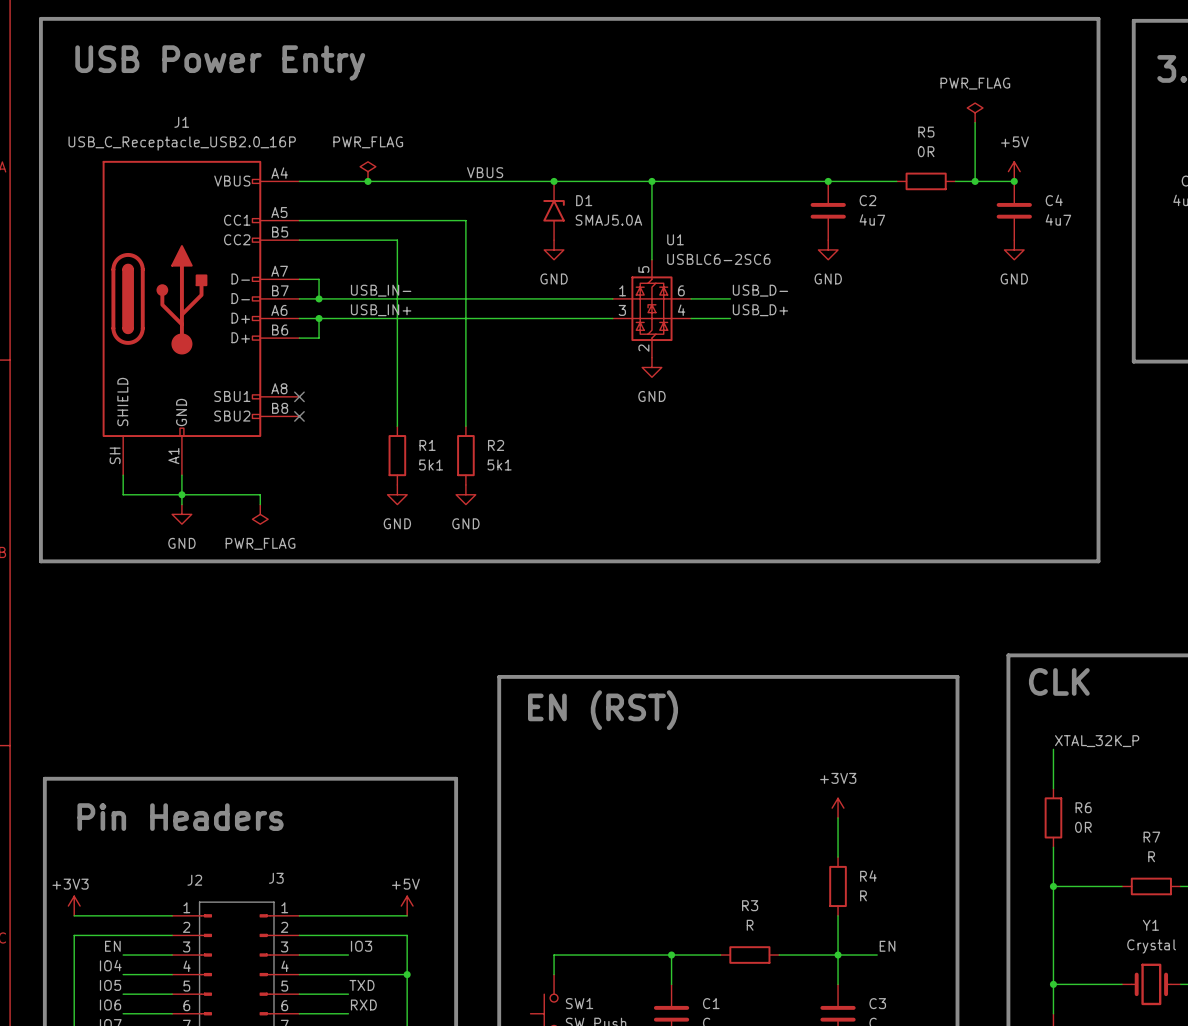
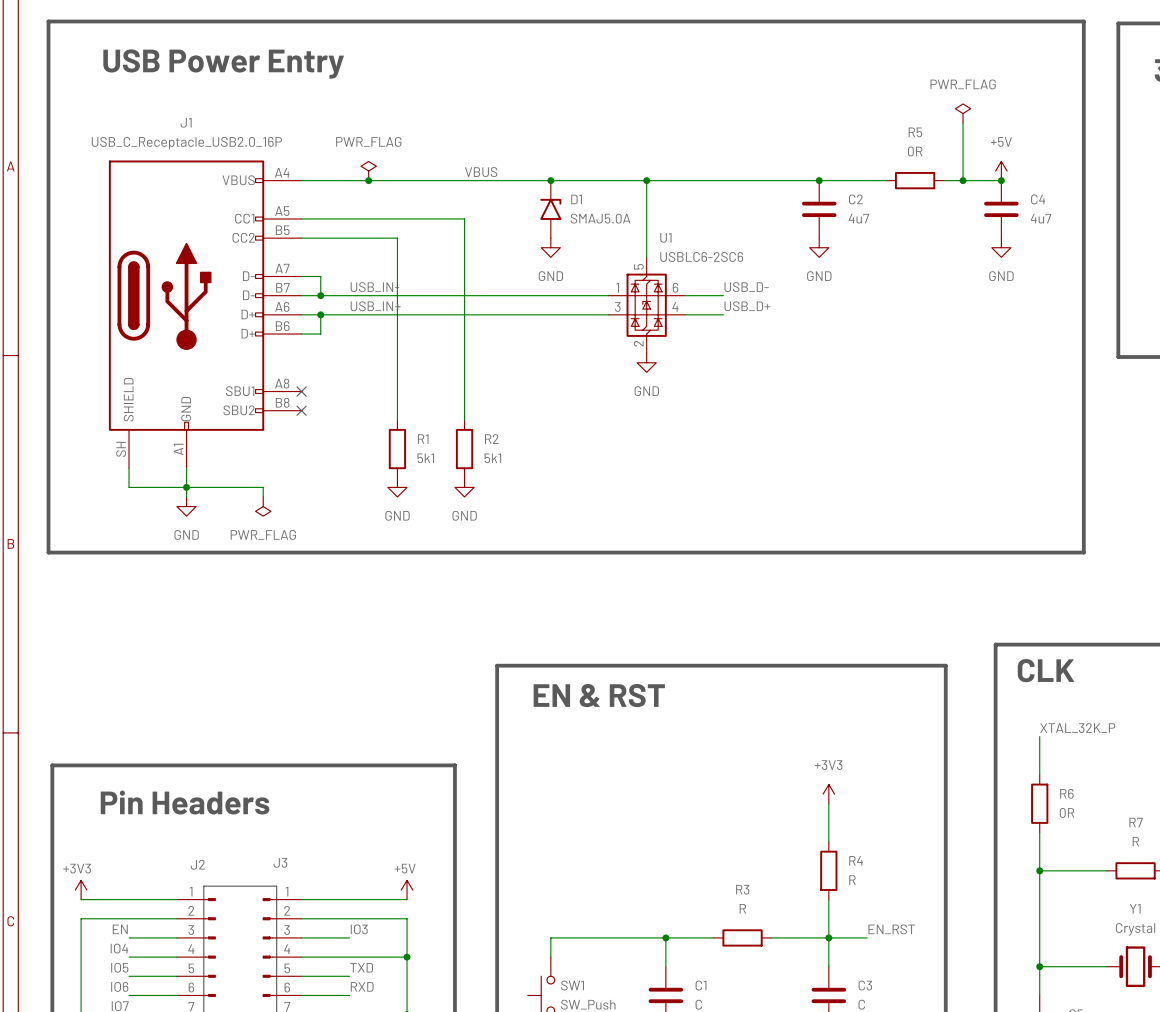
text: EN (RST) (603, 710) -> EN & RST (599, 695)
label: EN (887, 946) -> EN_RST (891, 929)

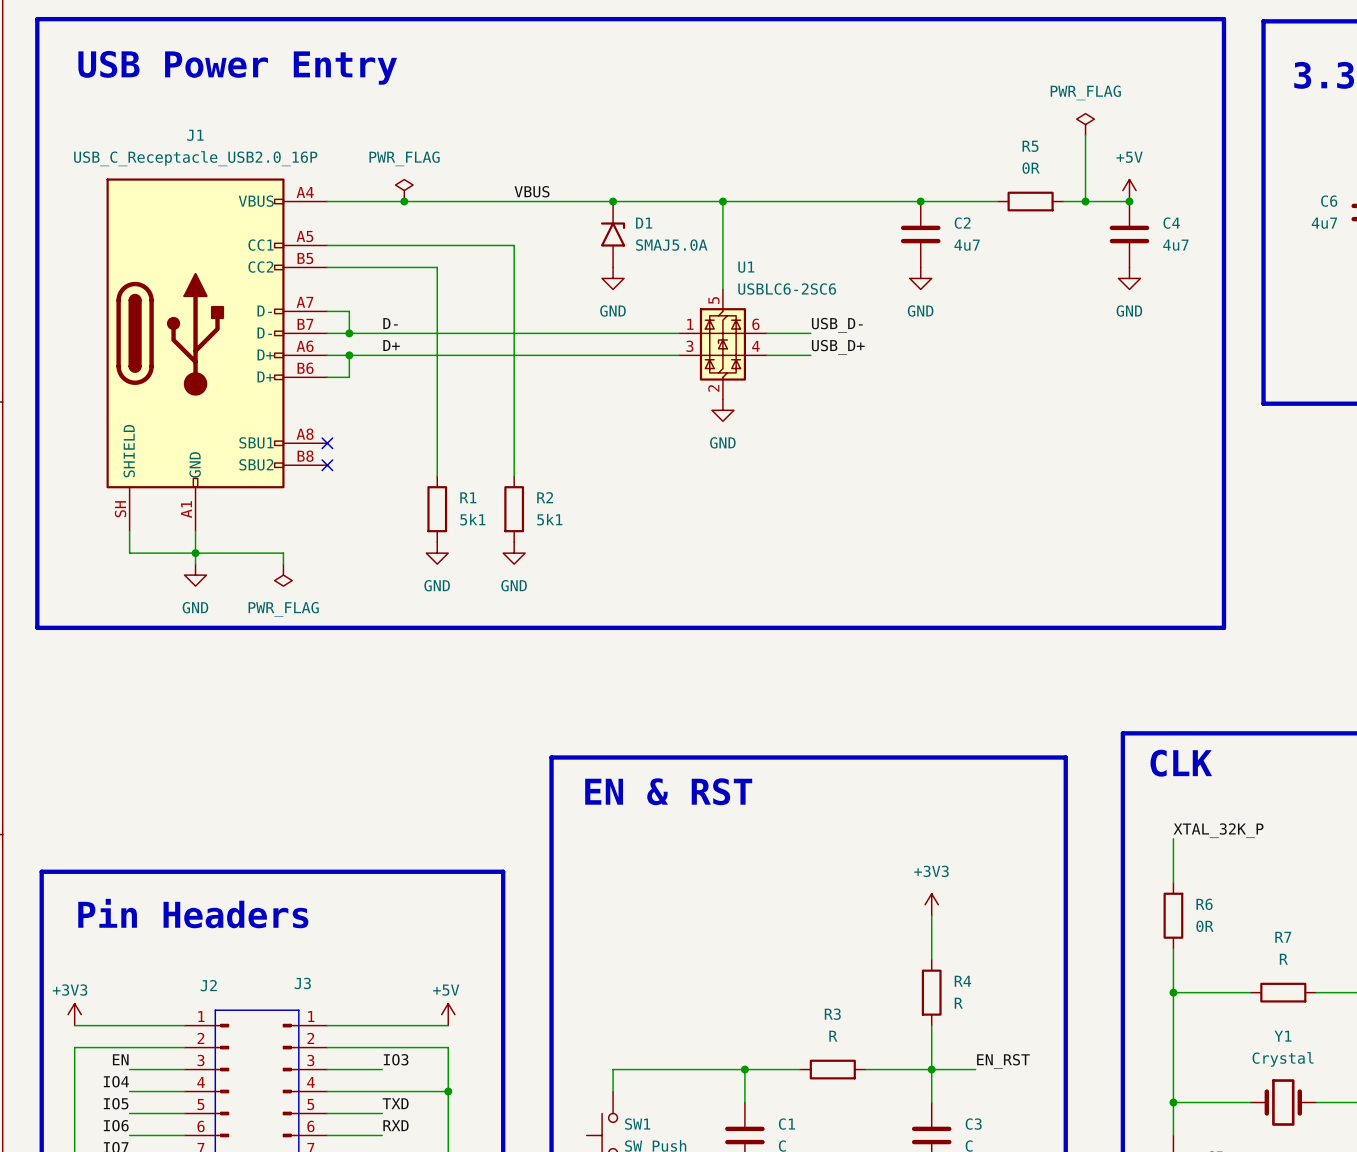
label: USB_IN- (374, 287) -> D- (390, 323)
label: USB_IN+ (375, 306) -> D+ (391, 345)

